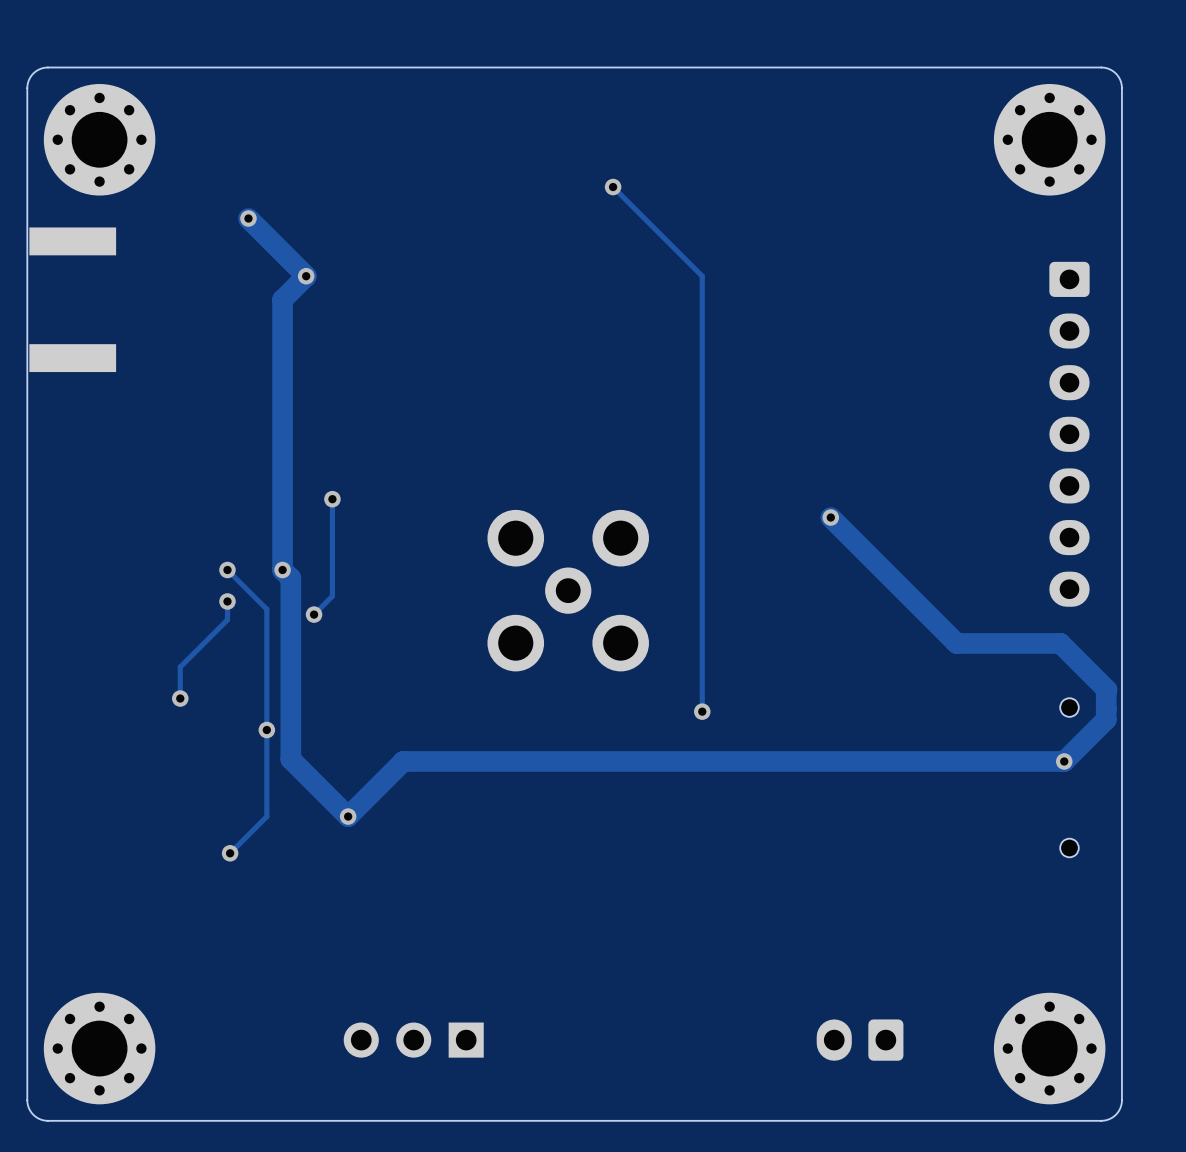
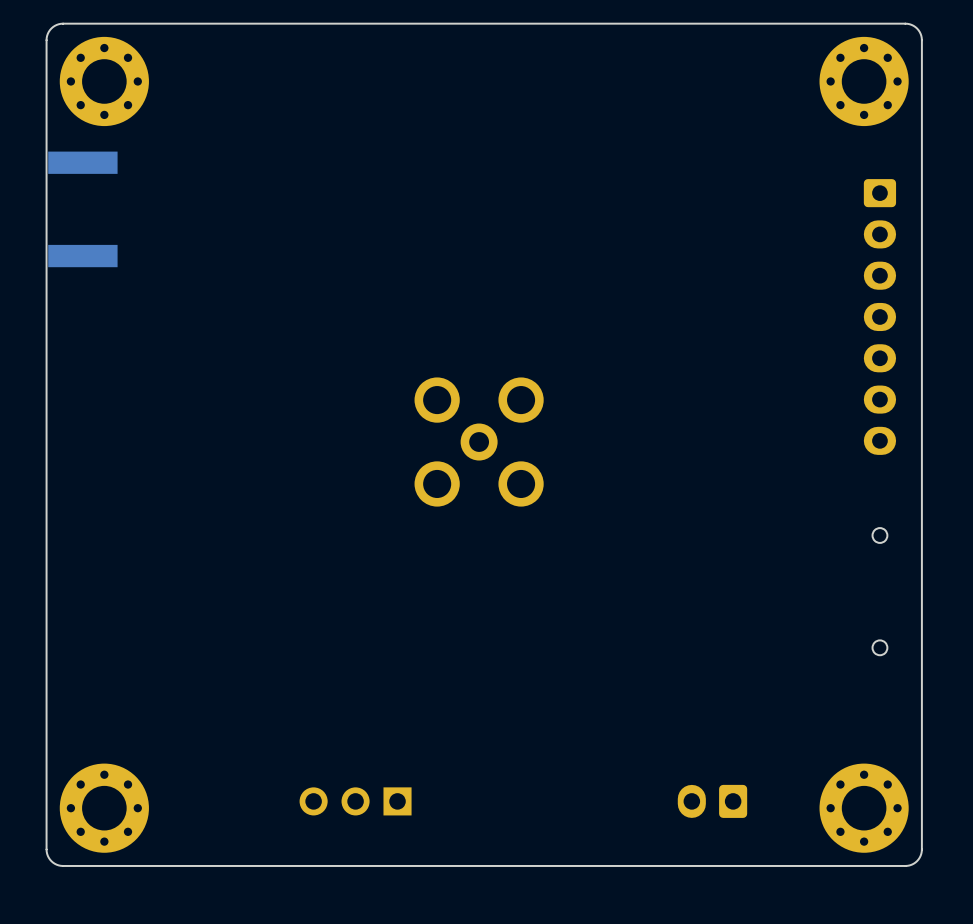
track: (613, 187) (702, 276) (702, 711) -> none
via: (613, 187) -> none
track: (248, 218) (306, 276) (282, 299) (282, 570) (290, 578) (290, 759) (348, 816) (403, 761) (1064, 761) (1106, 719) (1106, 689) (1060, 643) (956, 643) (830, 517) -> none
via: (248, 218) -> none
via: (306, 276) -> none
track: (332, 499) (332, 596) (314, 614) -> none
via: (332, 499) -> none
via: (830, 517) -> none
track: (227, 570) (266, 609) (266, 816) (230, 853) -> none
via: (227, 570) -> none
via: (282, 570) -> none
track: (227, 601) (227, 619) (180, 667) (180, 698) -> none
via: (227, 601) -> none
via: (314, 614) -> none
via: (180, 698) -> none
via: (702, 711) -> none
via: (266, 730) -> none
via: (1064, 761) -> none
via: (348, 816) -> none
via: (230, 853) -> none

